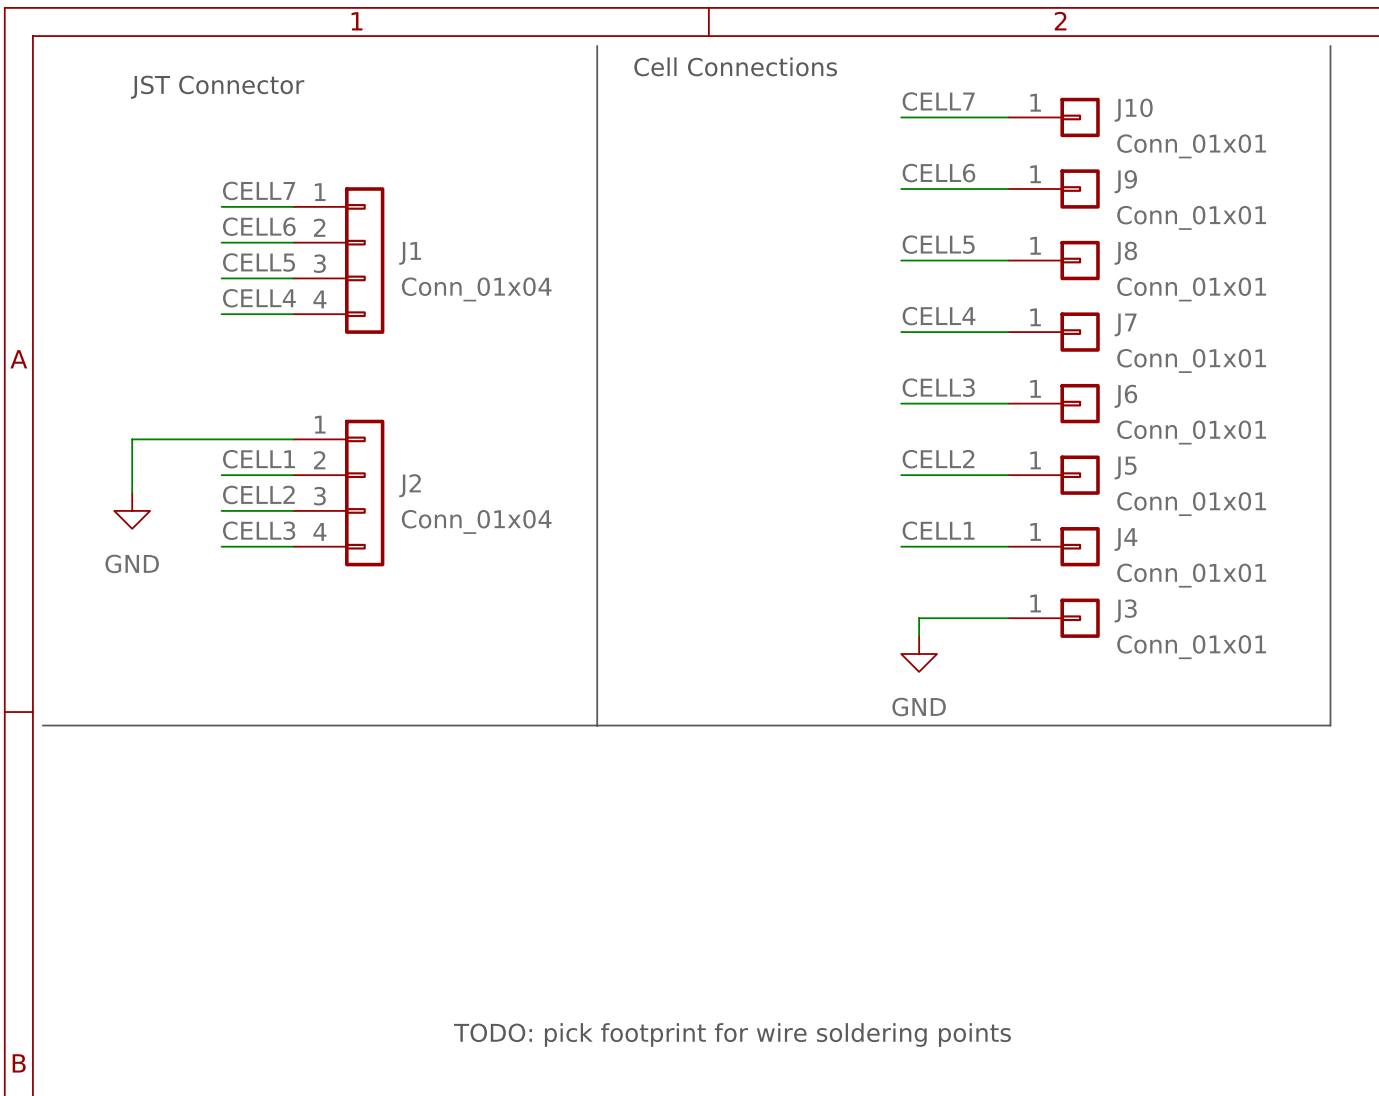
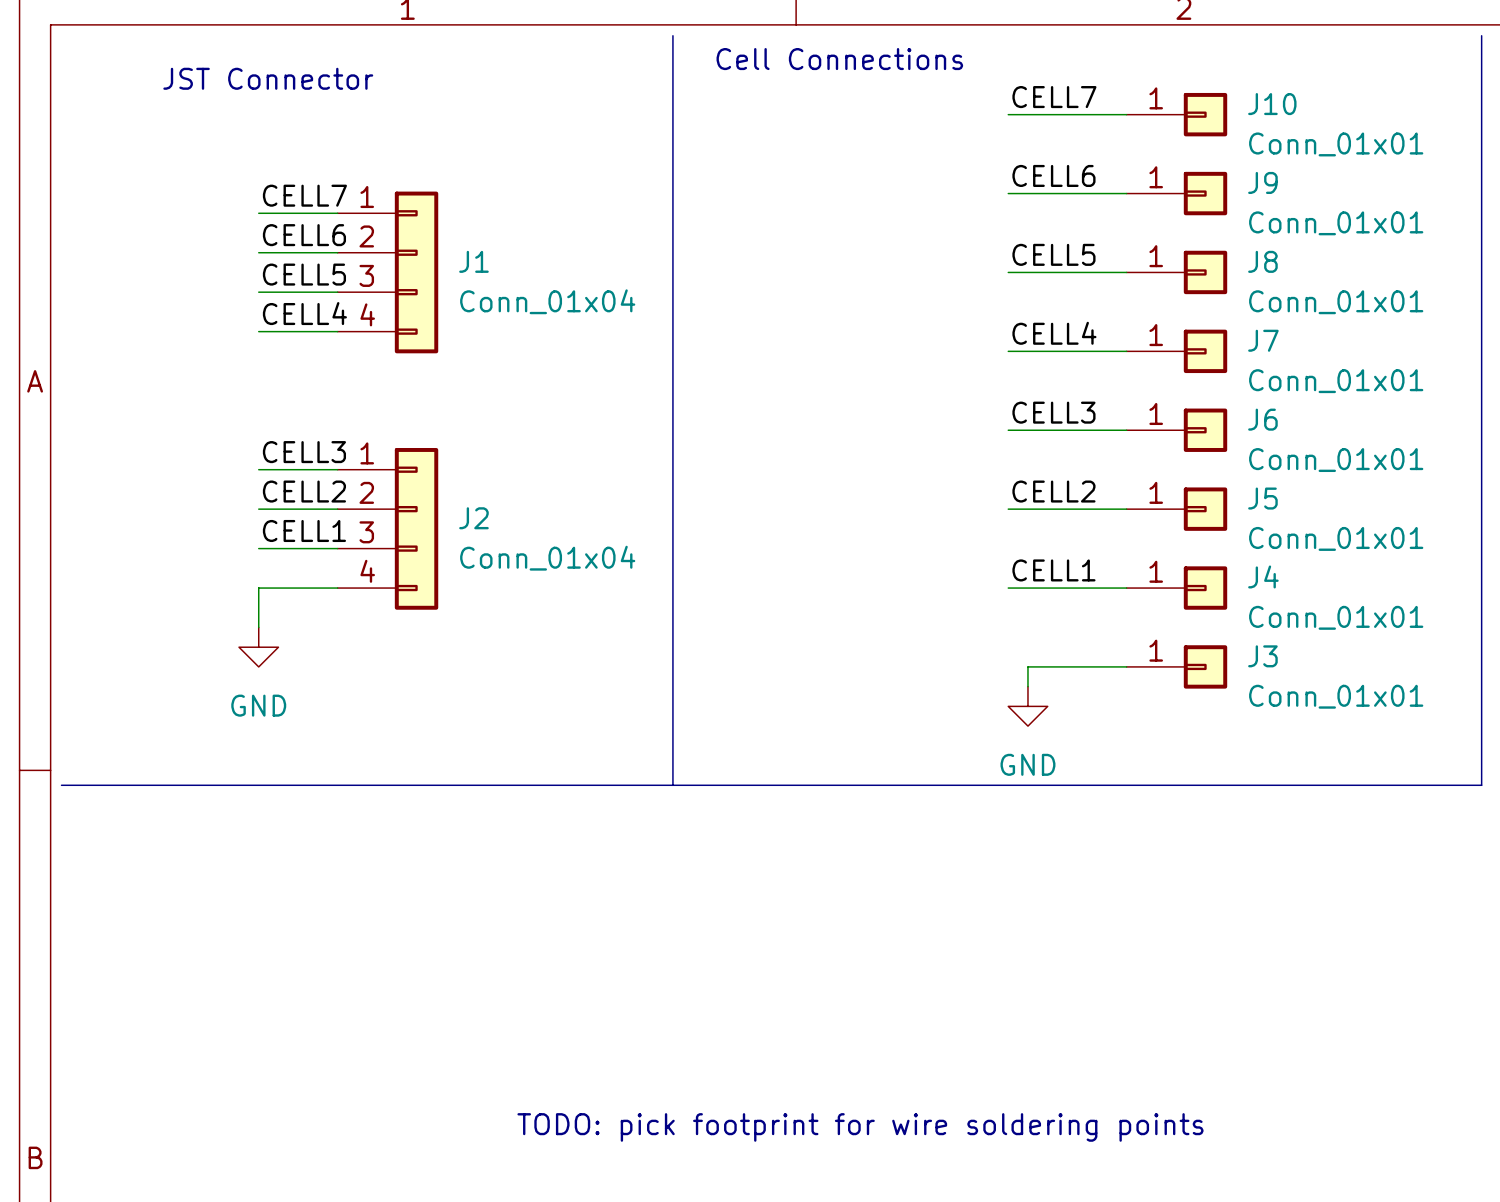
wire: (221, 439) (132, 439) (132, 493) -> none
label: CELL1 (258, 459) -> CELL2 (304, 491)
label: CELL2 (258, 494) -> CELL1 (304, 530)
power symbol position: GND (132, 510) -> GND (258, 647)
label position: CELL3 (259, 530) -> CELL3 (304, 452)
wire: none -> (258, 588) (258, 627)

